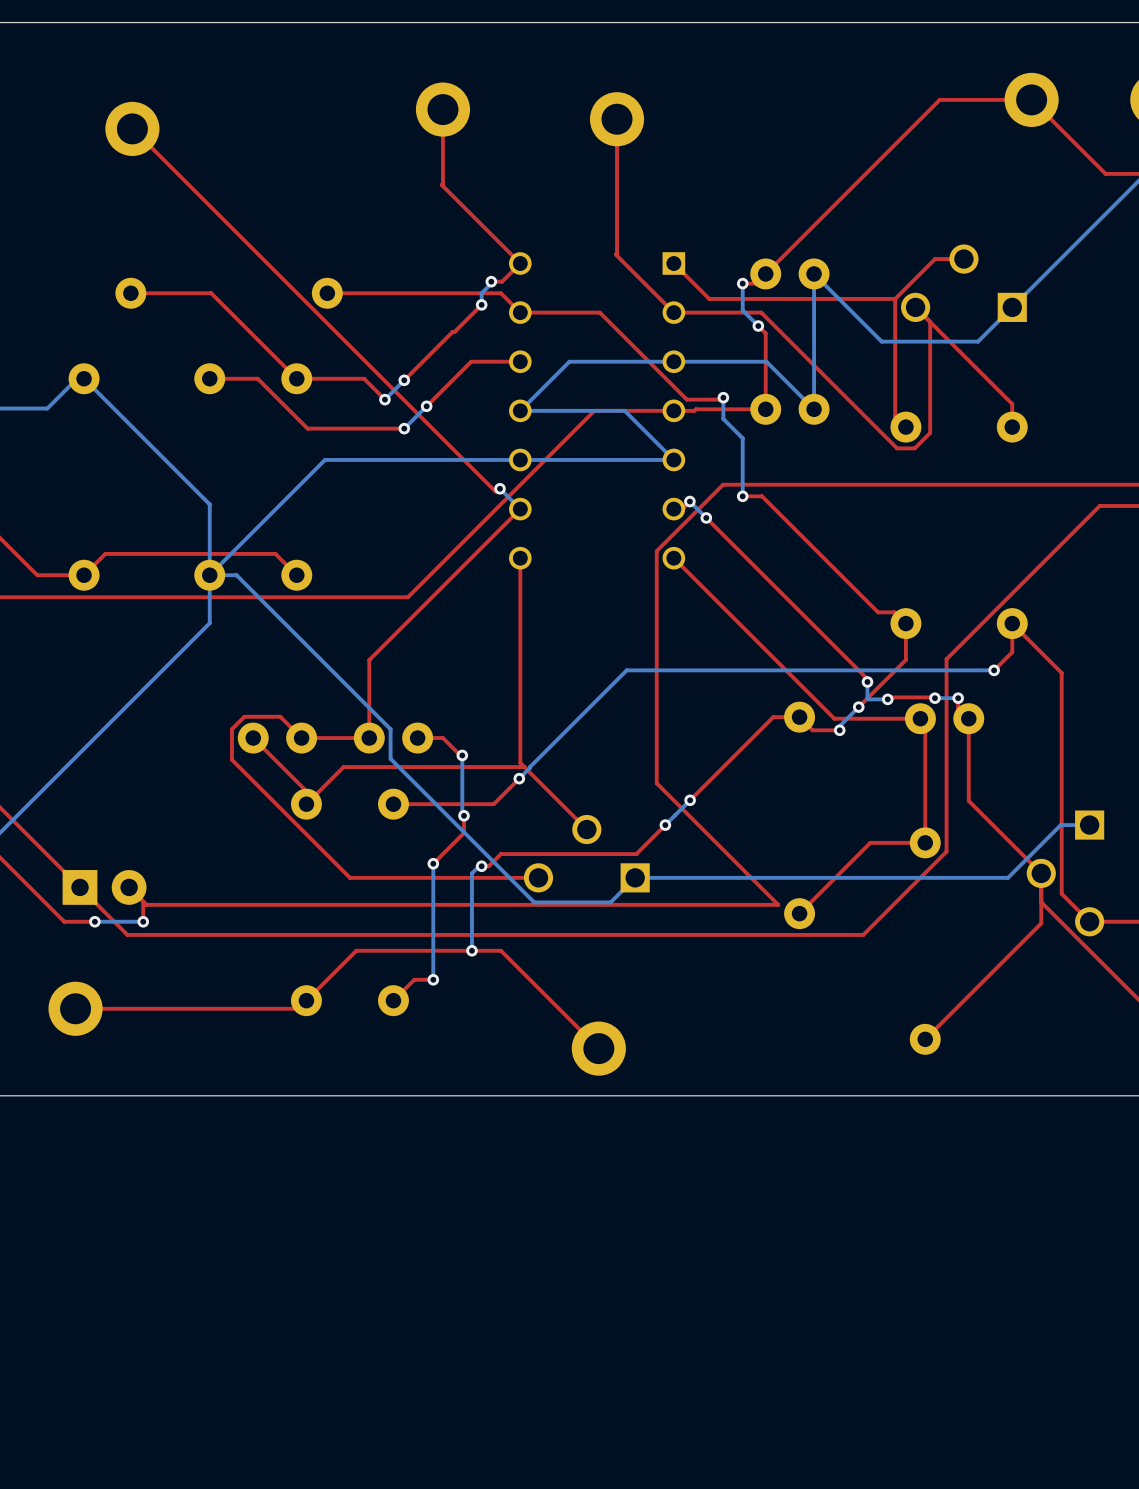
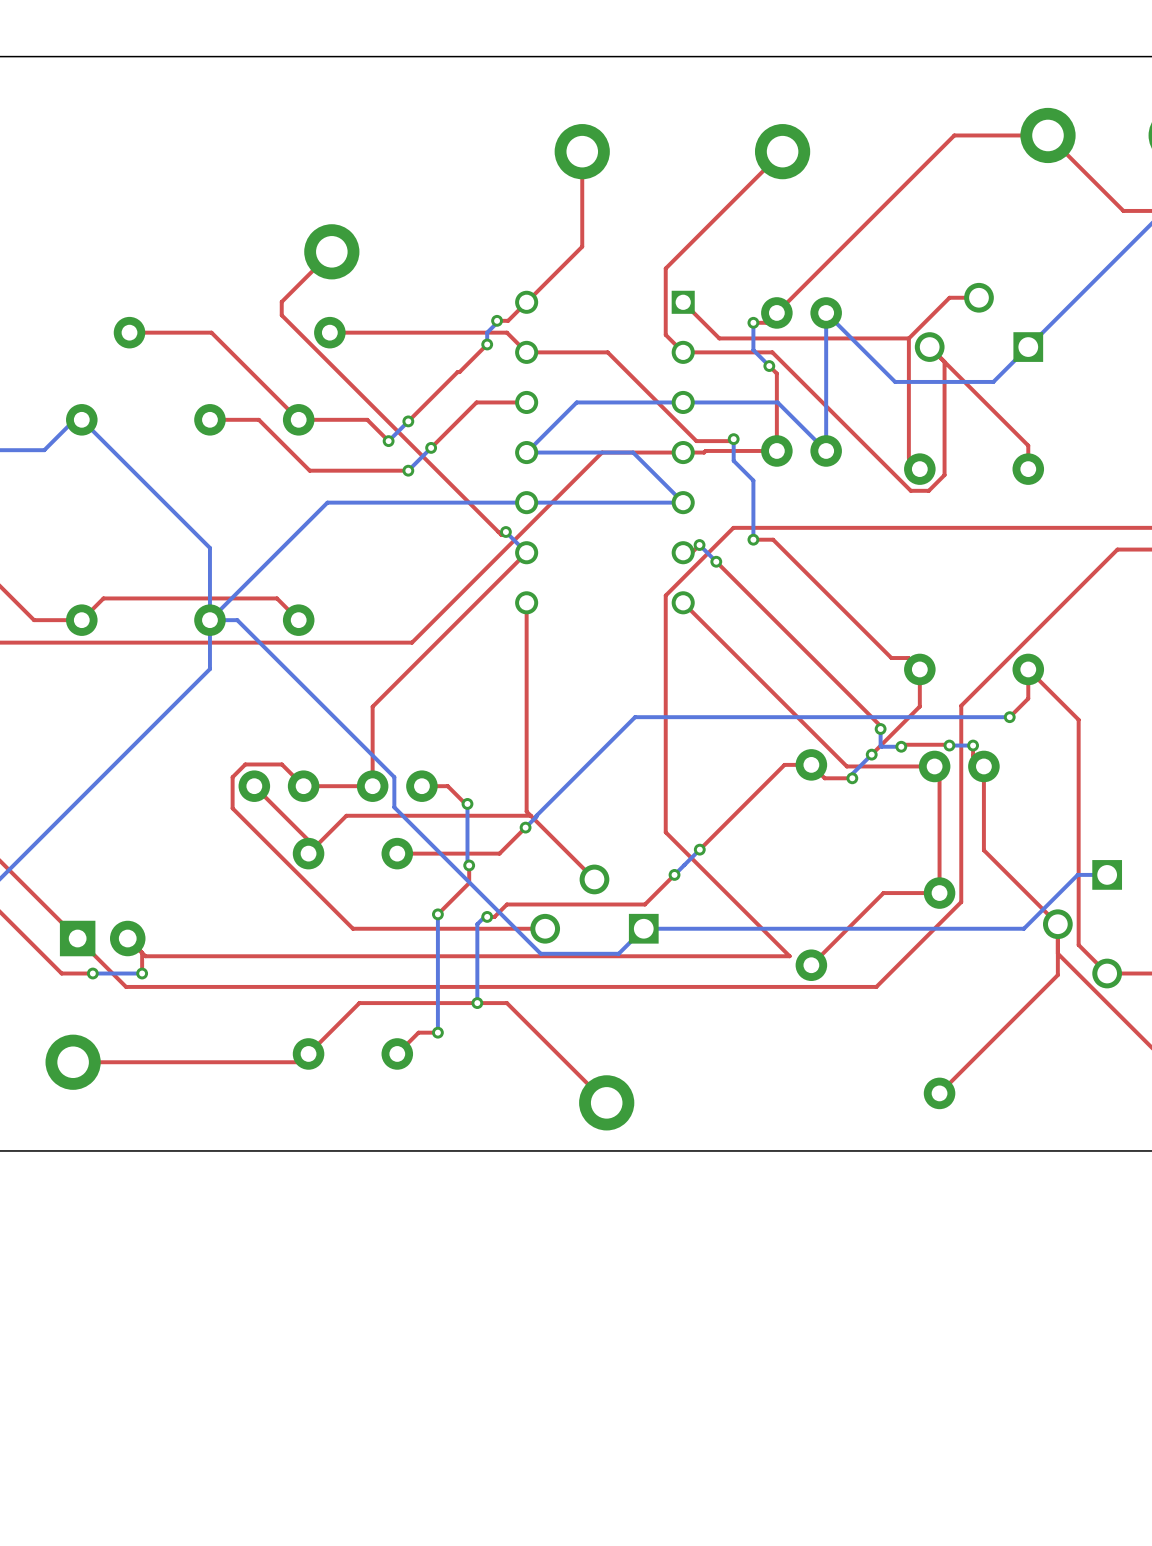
top track: (442, 109) (441, 184) (520, 263) -> (582, 151) (582, 246) (526, 302)
part: (442, 109) -> none
part: none -> (782, 151)
top track: (617, 119) (615, 254) (656, 295) -> (782, 151) (665, 268) (665, 334)
part position: (617, 119) -> (582, 151)
top track: (132, 128) (280, 276) -> (331, 251) (281, 301) (281, 315)
part: (132, 128) -> none
part: none -> (331, 251)

